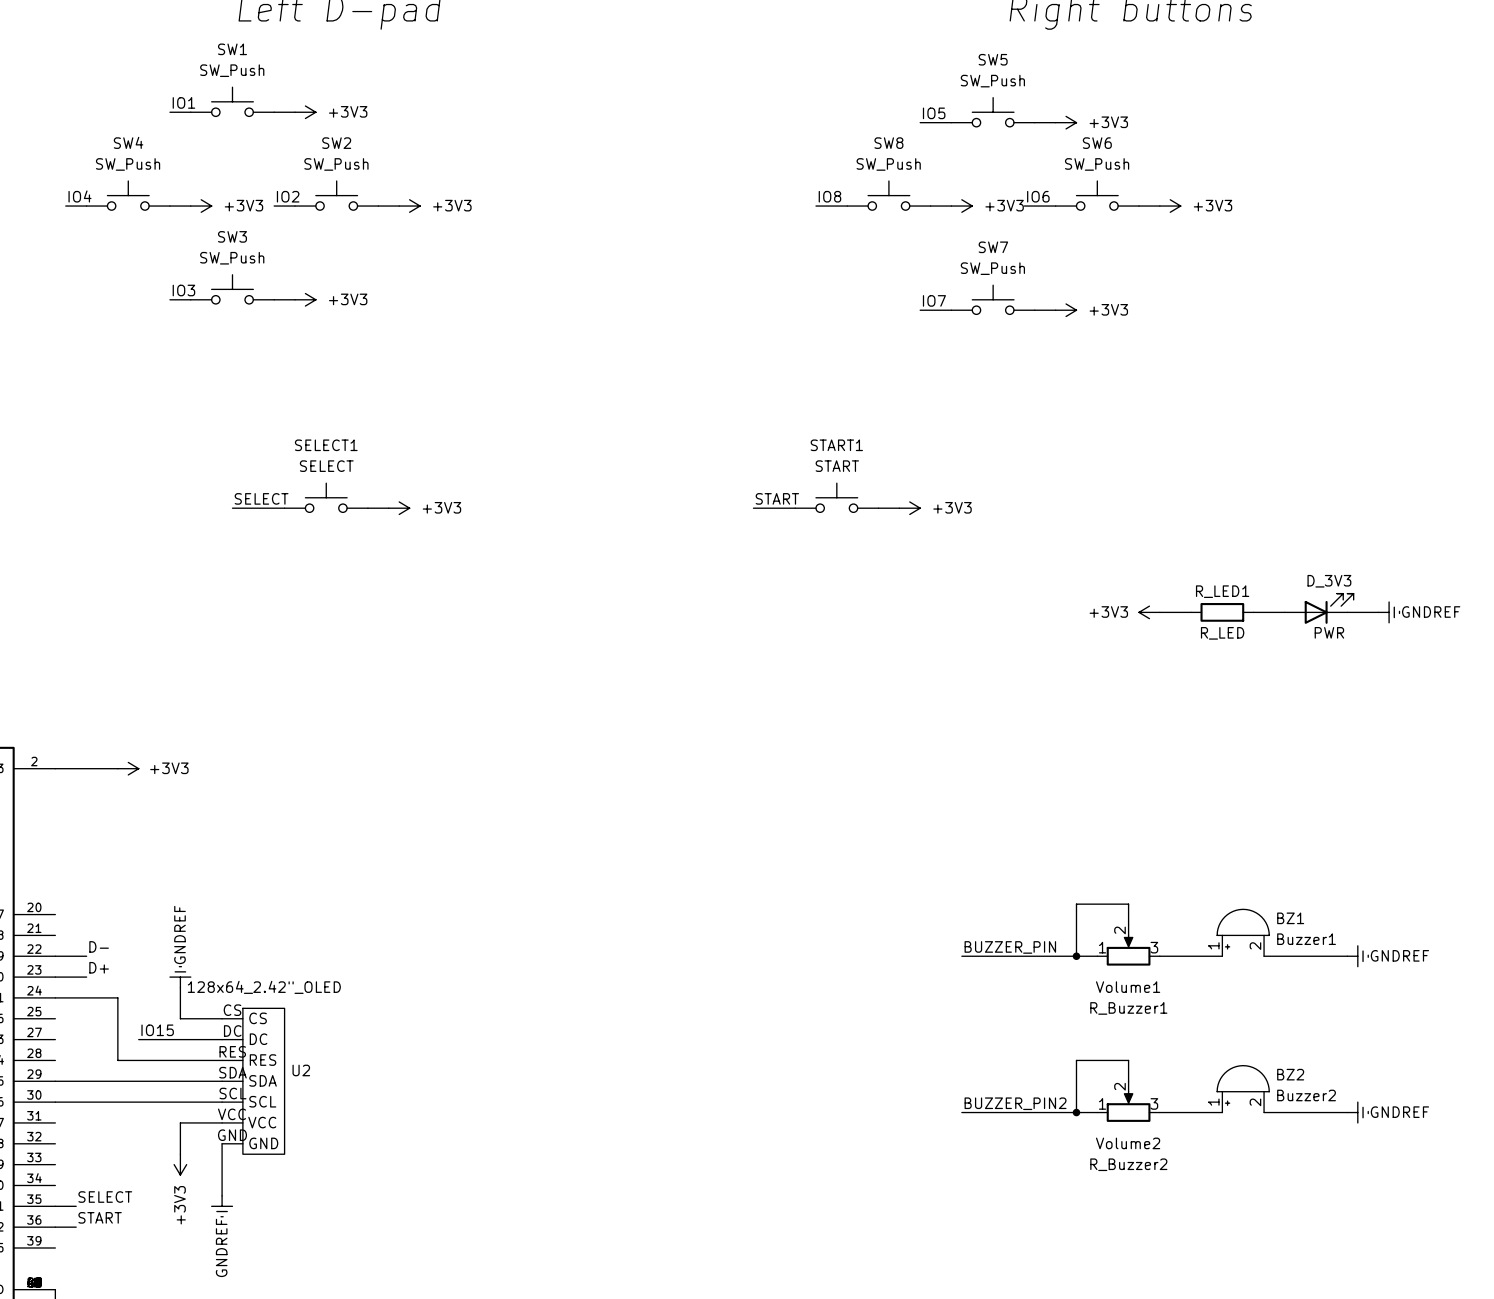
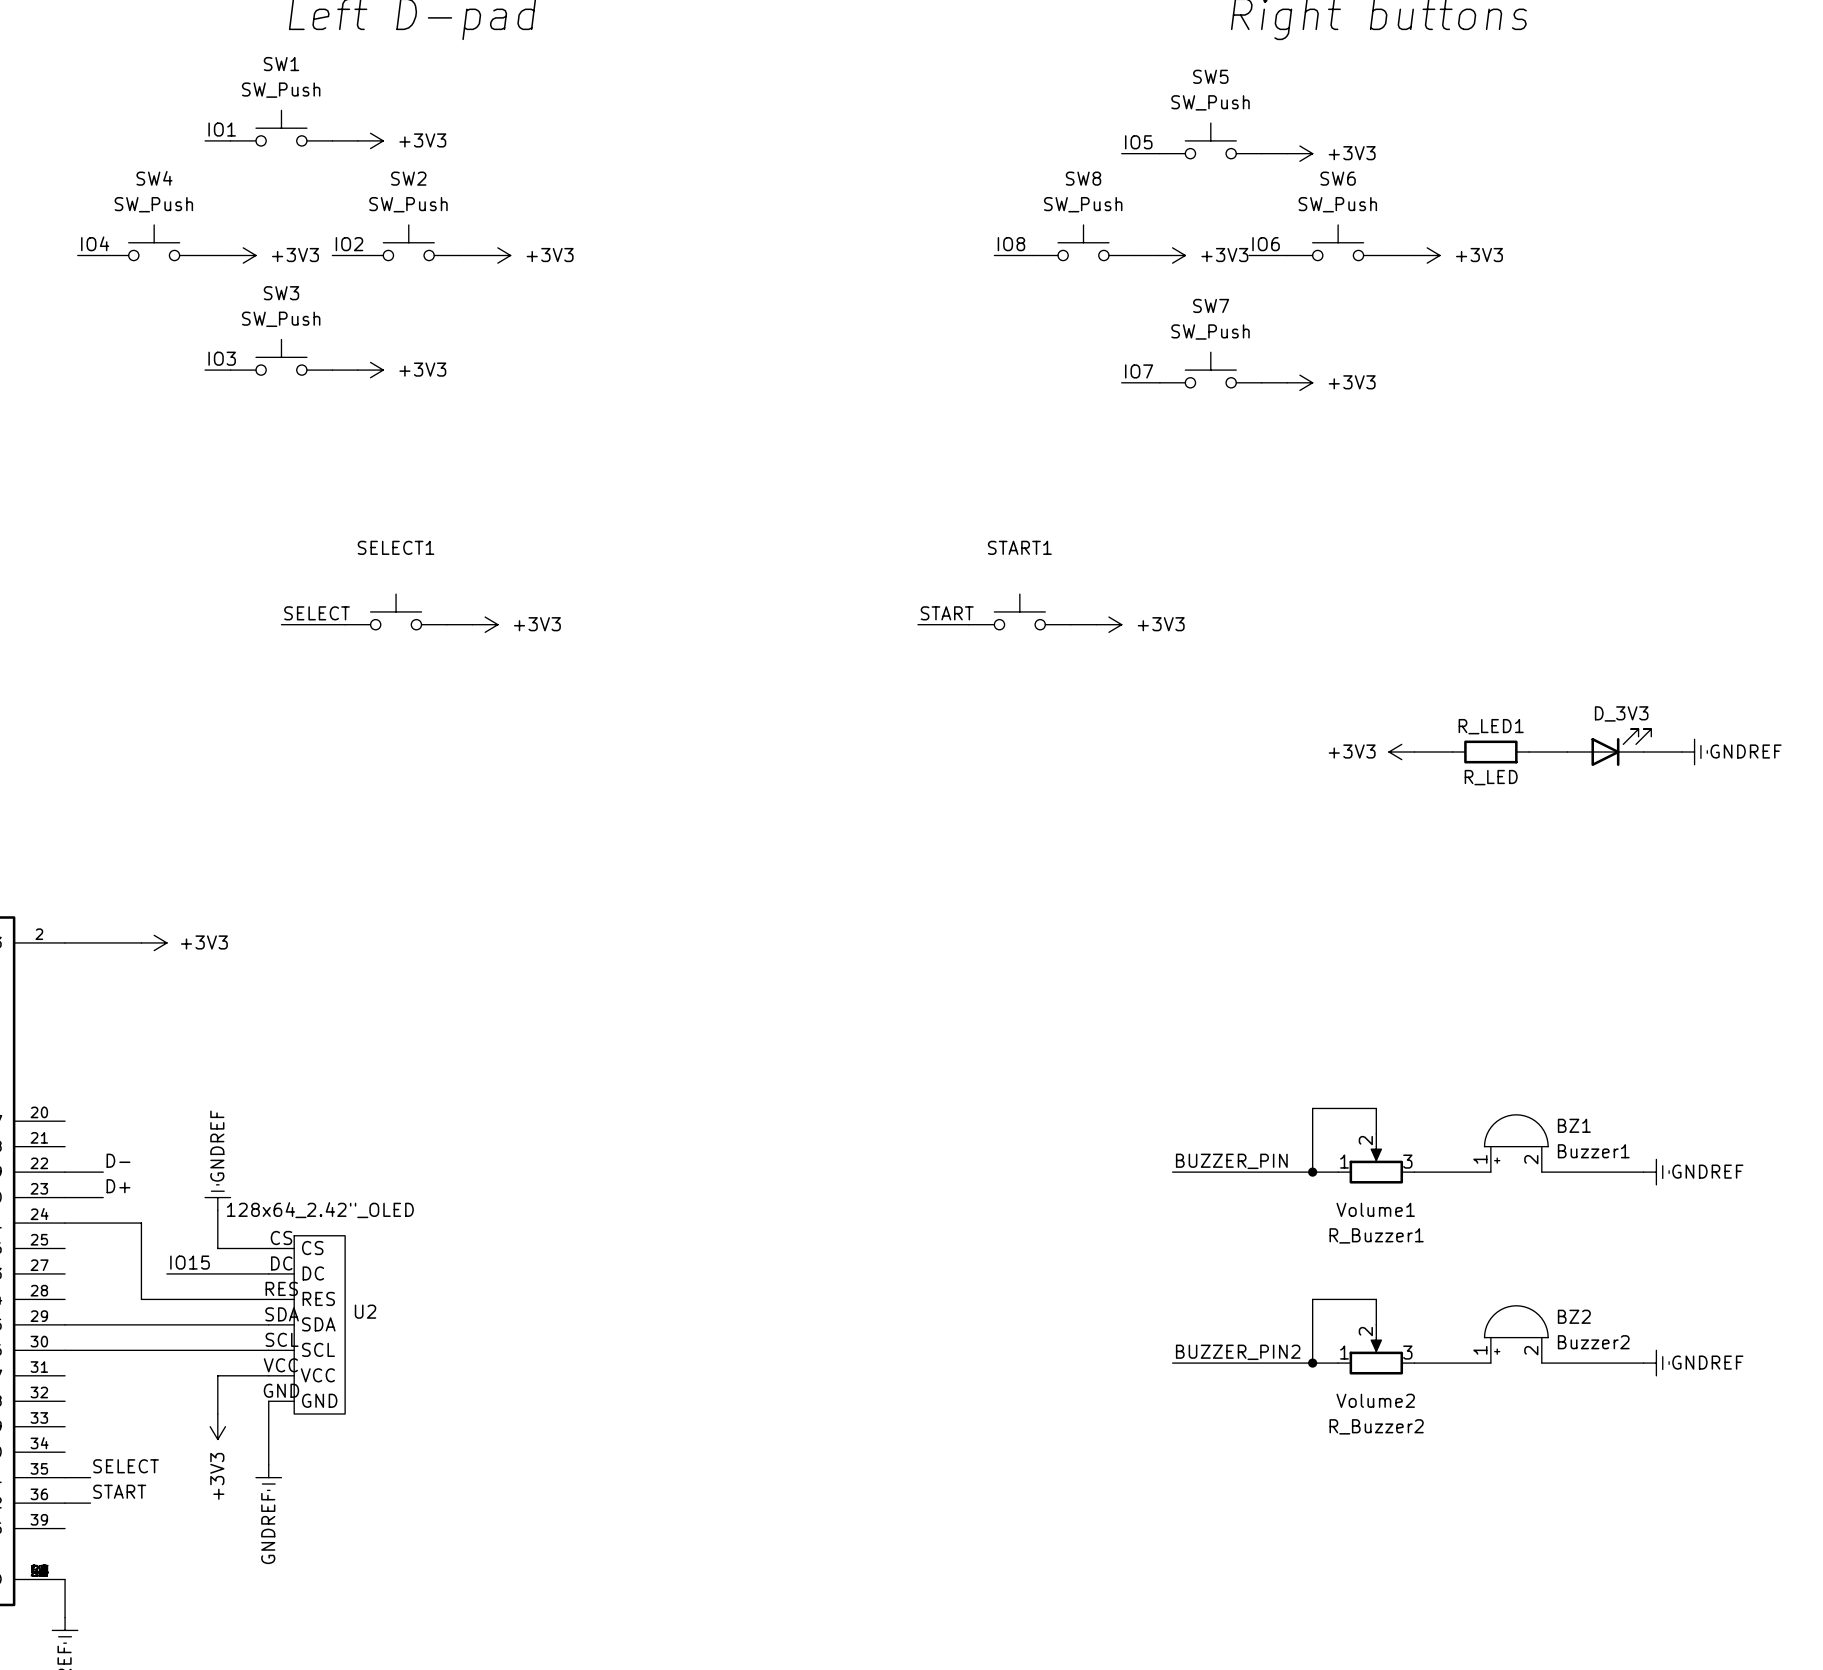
SELECT1 value: SELECT (326, 466) -> none
START1 value: START (837, 466) -> none
D_3V3 value: PWR (1329, 632) -> none

